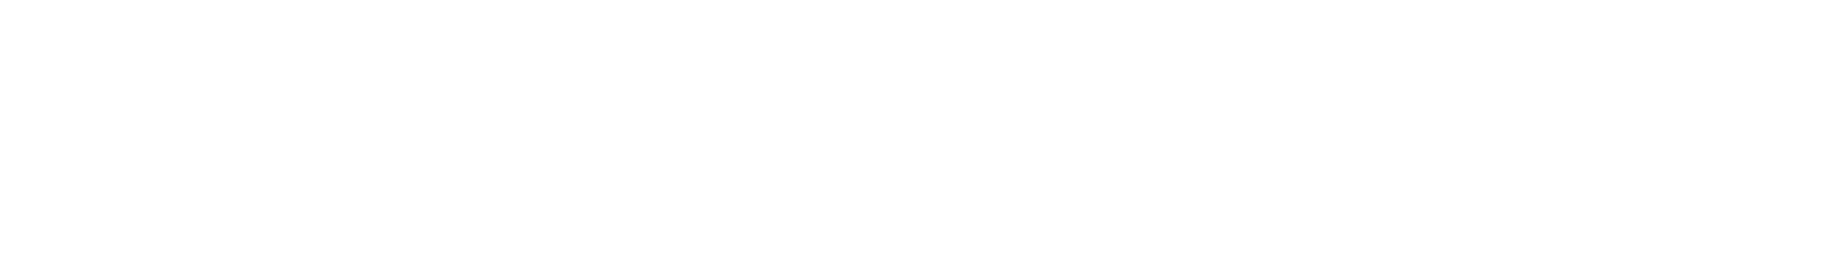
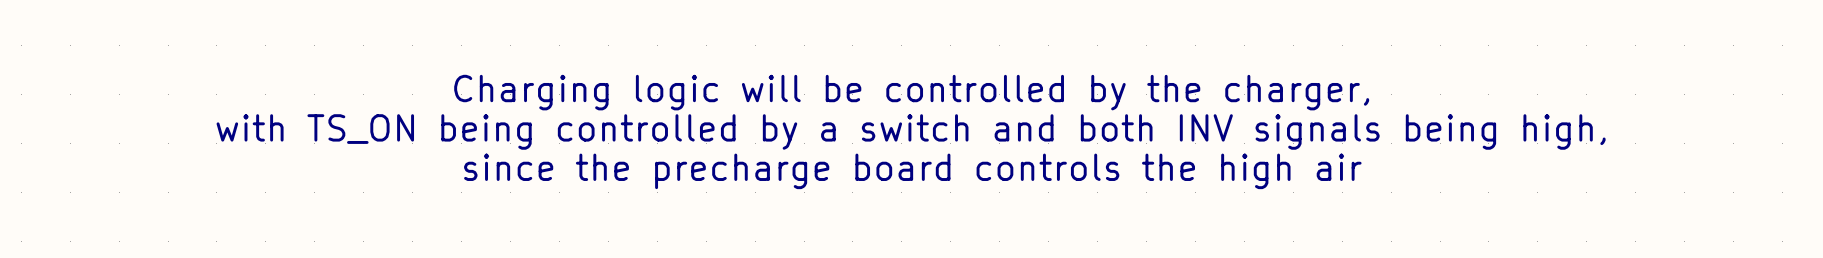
text: none -> Charging logic will be controlled by the charger, (911, 92)
text: none -> with TS_ON being controlled by a switch and both INV signals being high, (911, 131)
text: none -> since the precharge board controls the high air (912, 171)

